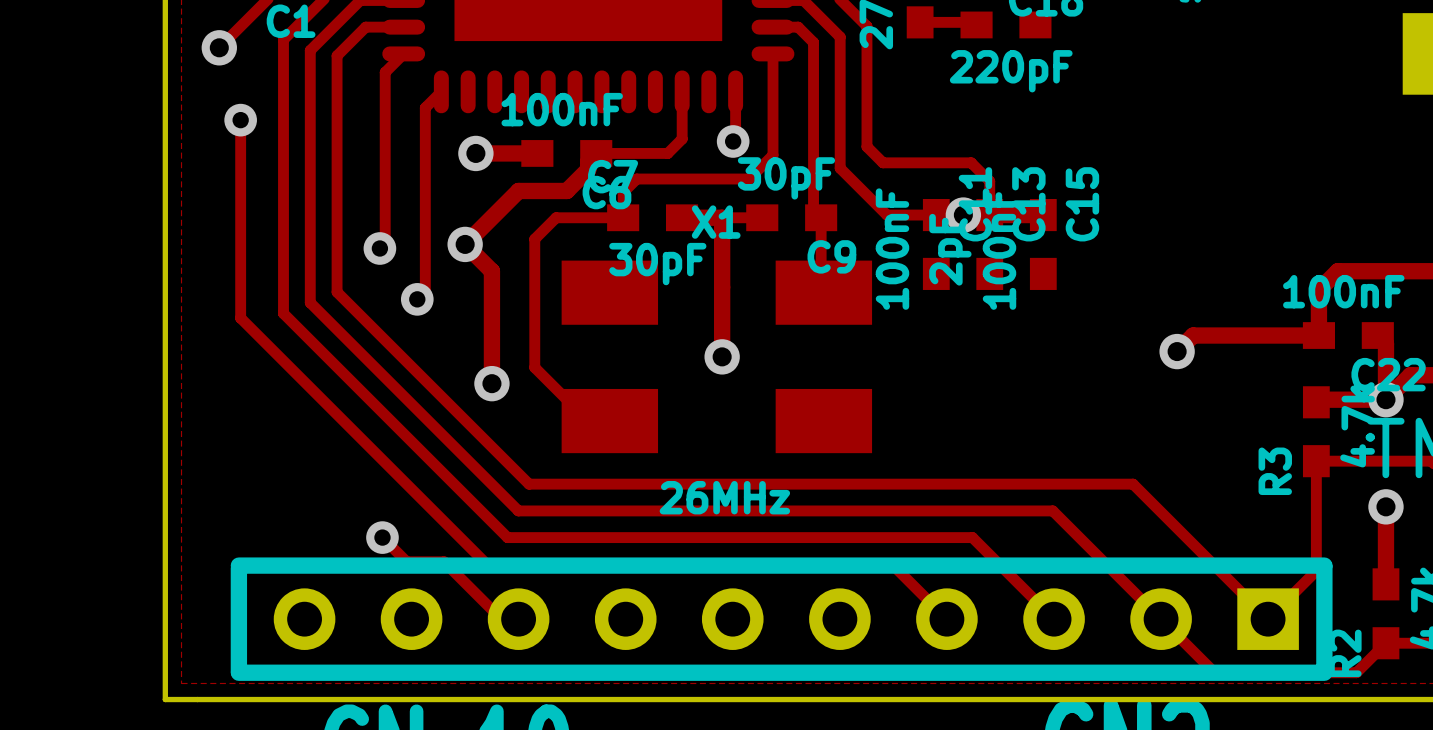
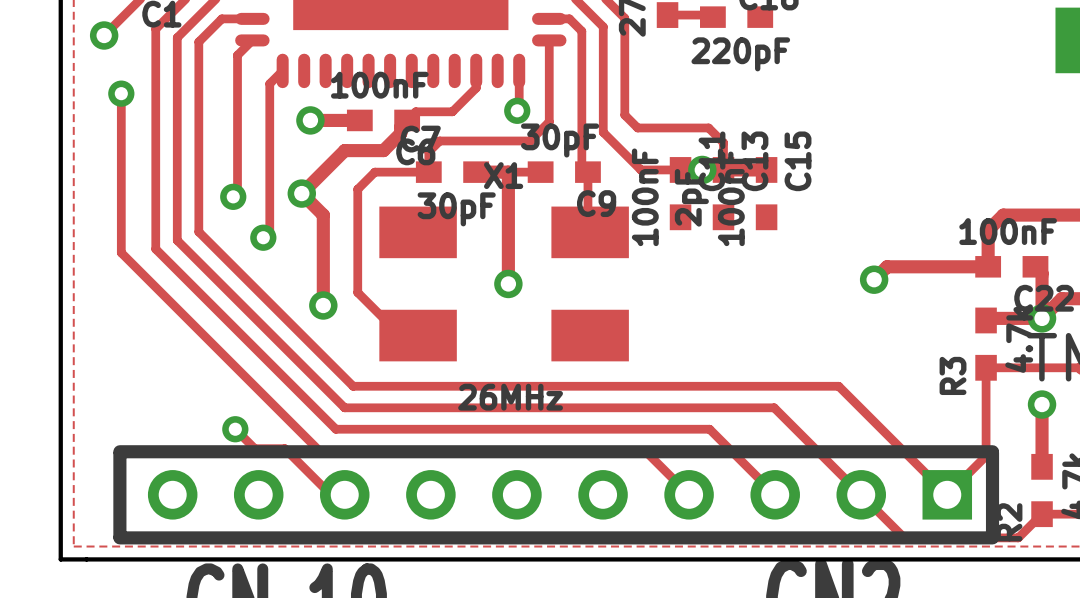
track: (682, 113) (682, 139) (667, 153) (596, 153) -> (476, 87) (452, 111) (415, 111) (407, 120)

